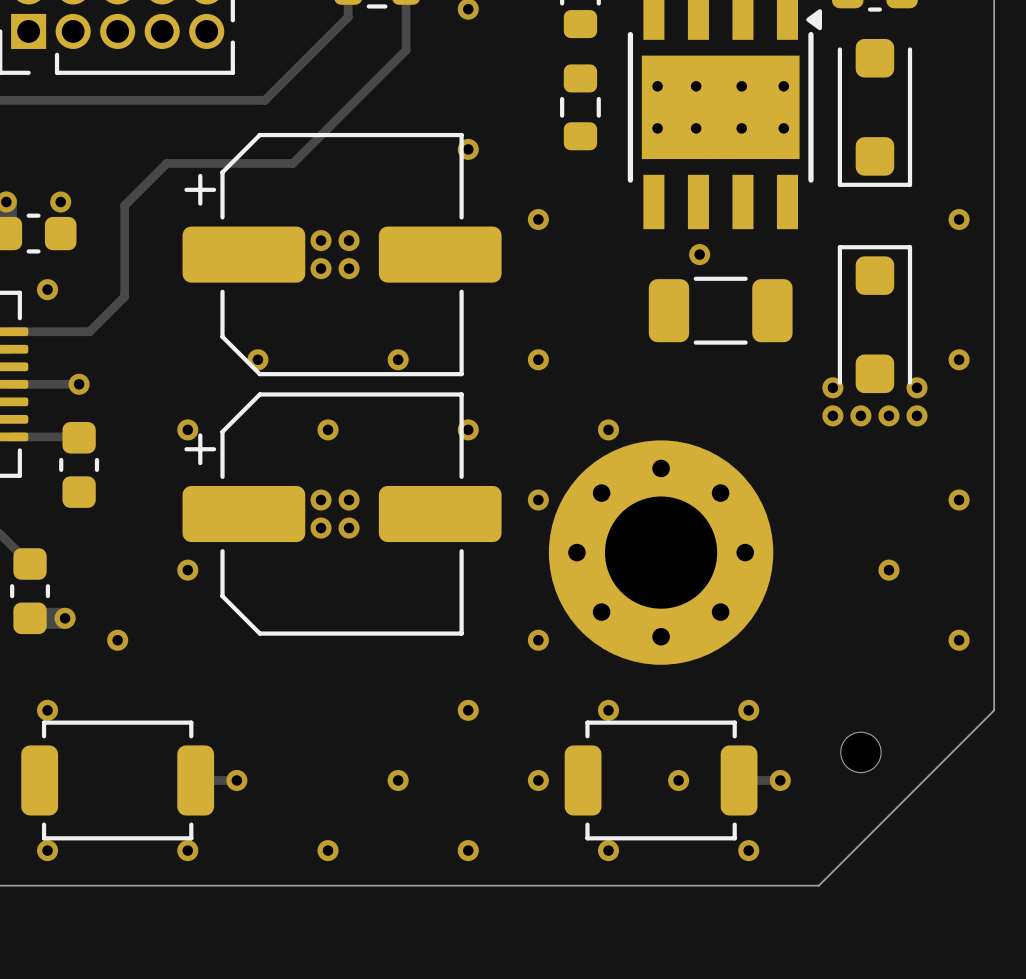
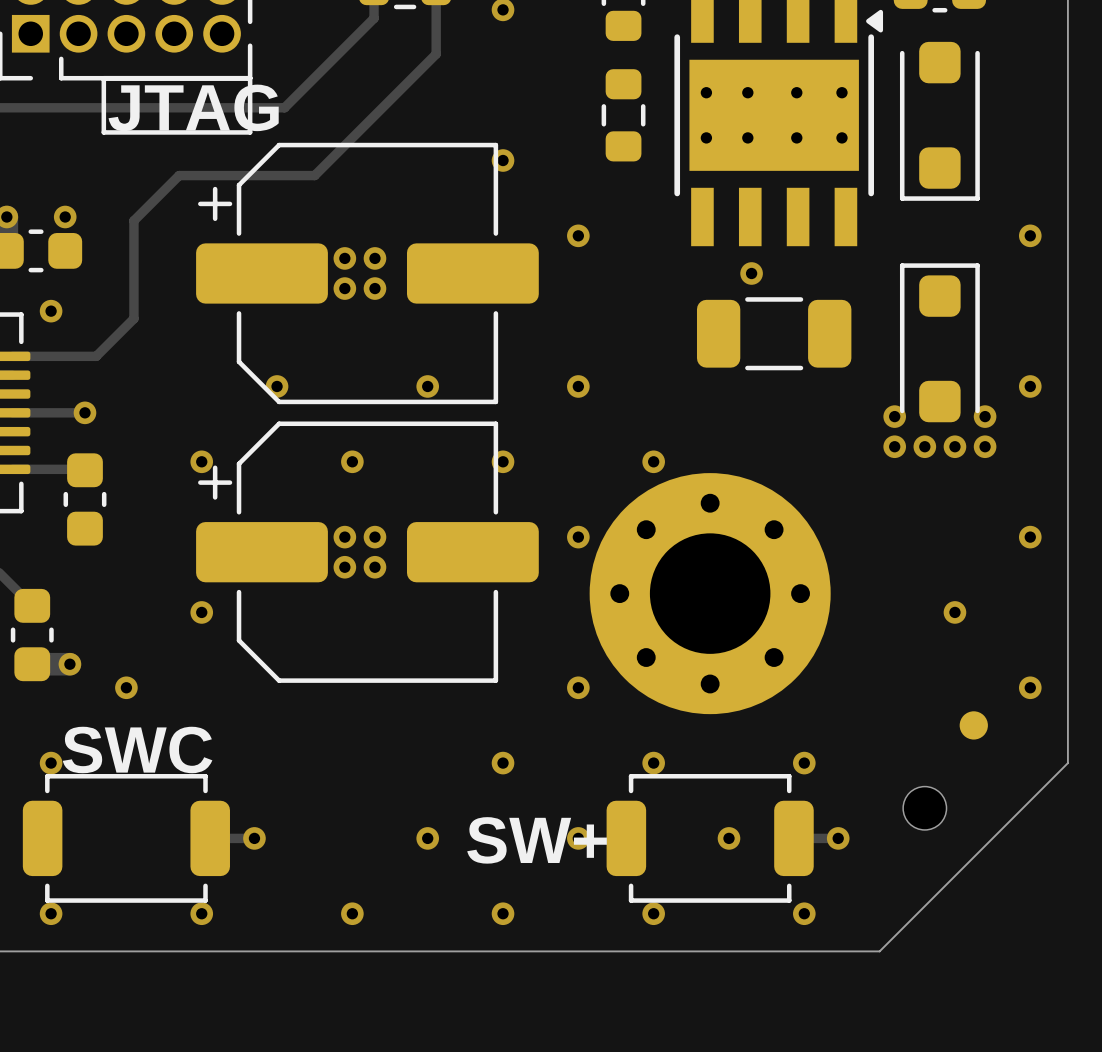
line: none -> (103, 78) (250, 78) (250, 132) (103, 132) (103, 78)
text: none -> JTAG (193, 107)
part: none -> (973, 725)
text: none -> SWC (137, 750)
text: none -> SW+ (537, 840)

